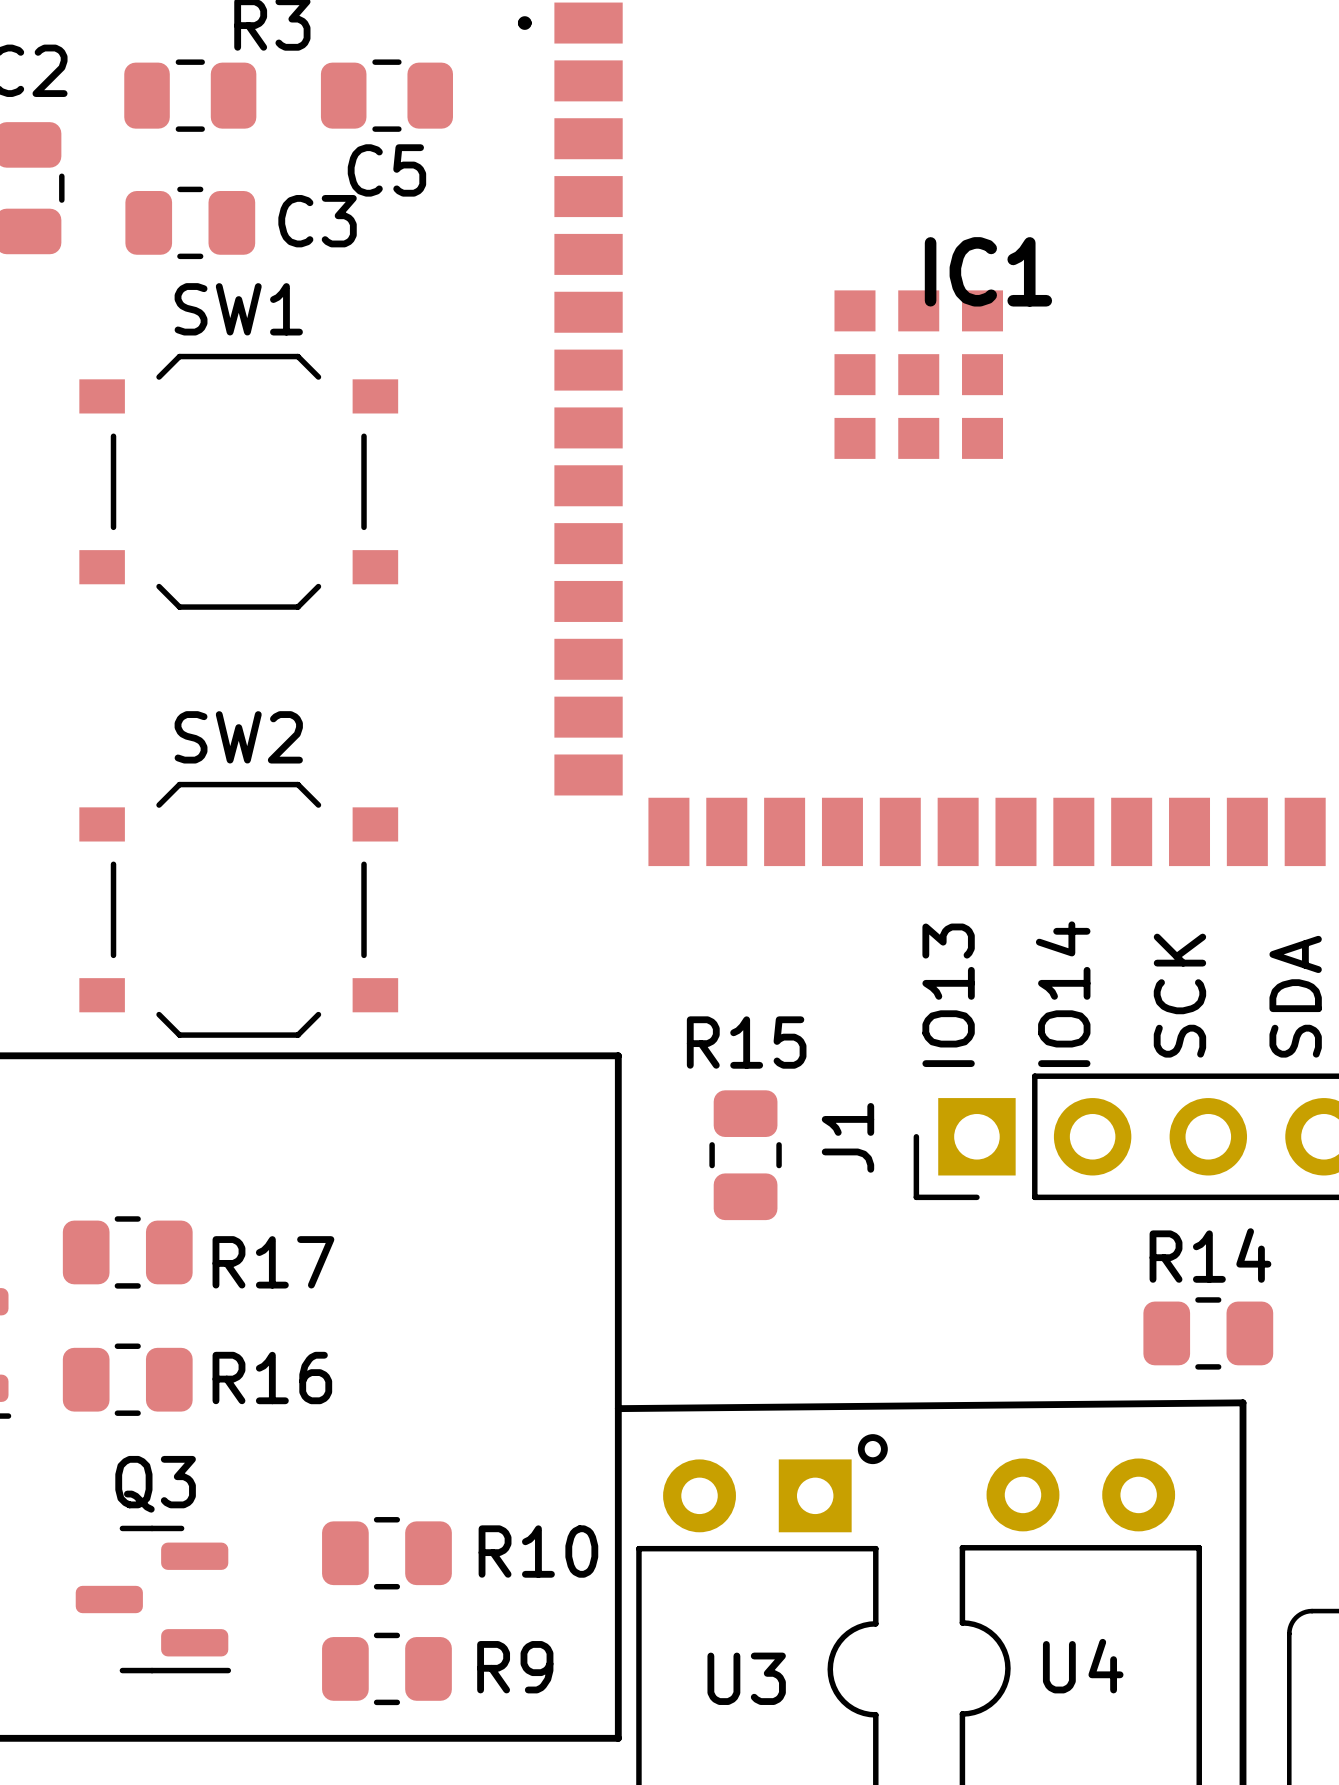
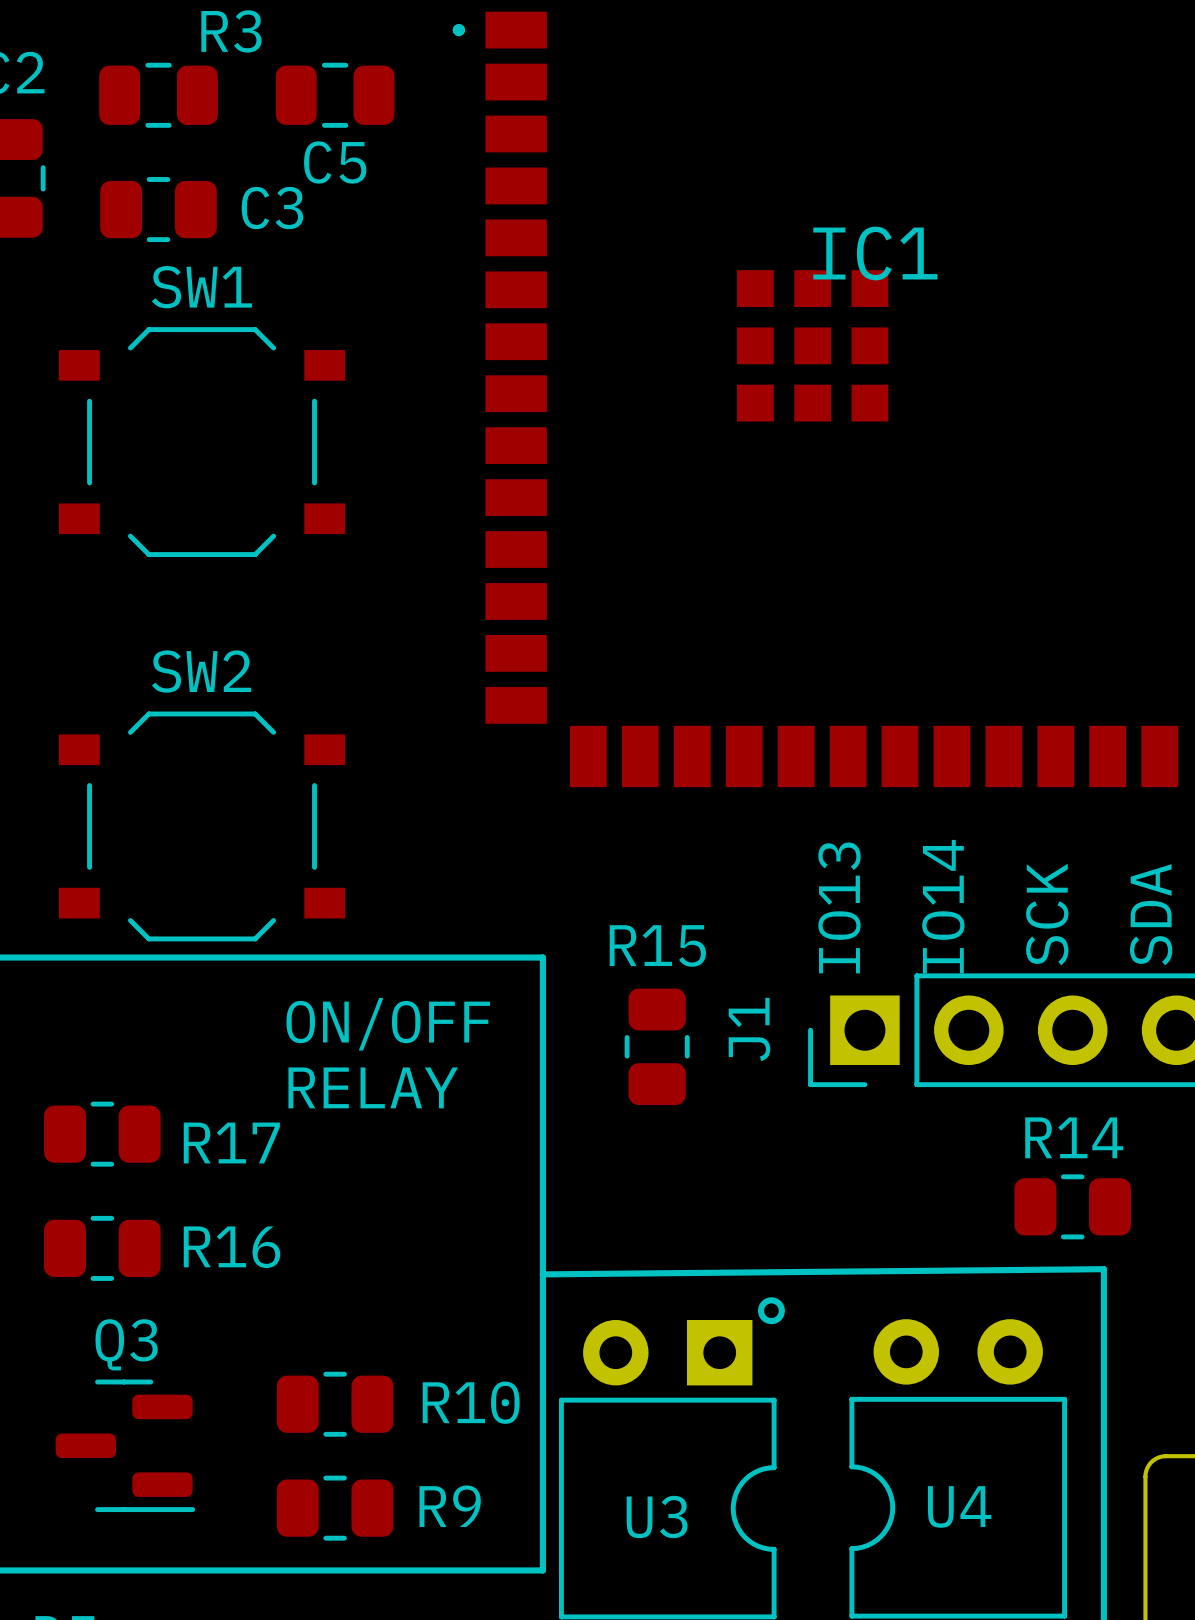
text: none -> ON/OFF (388, 1024)
text: none -> RELAY (373, 1087)

